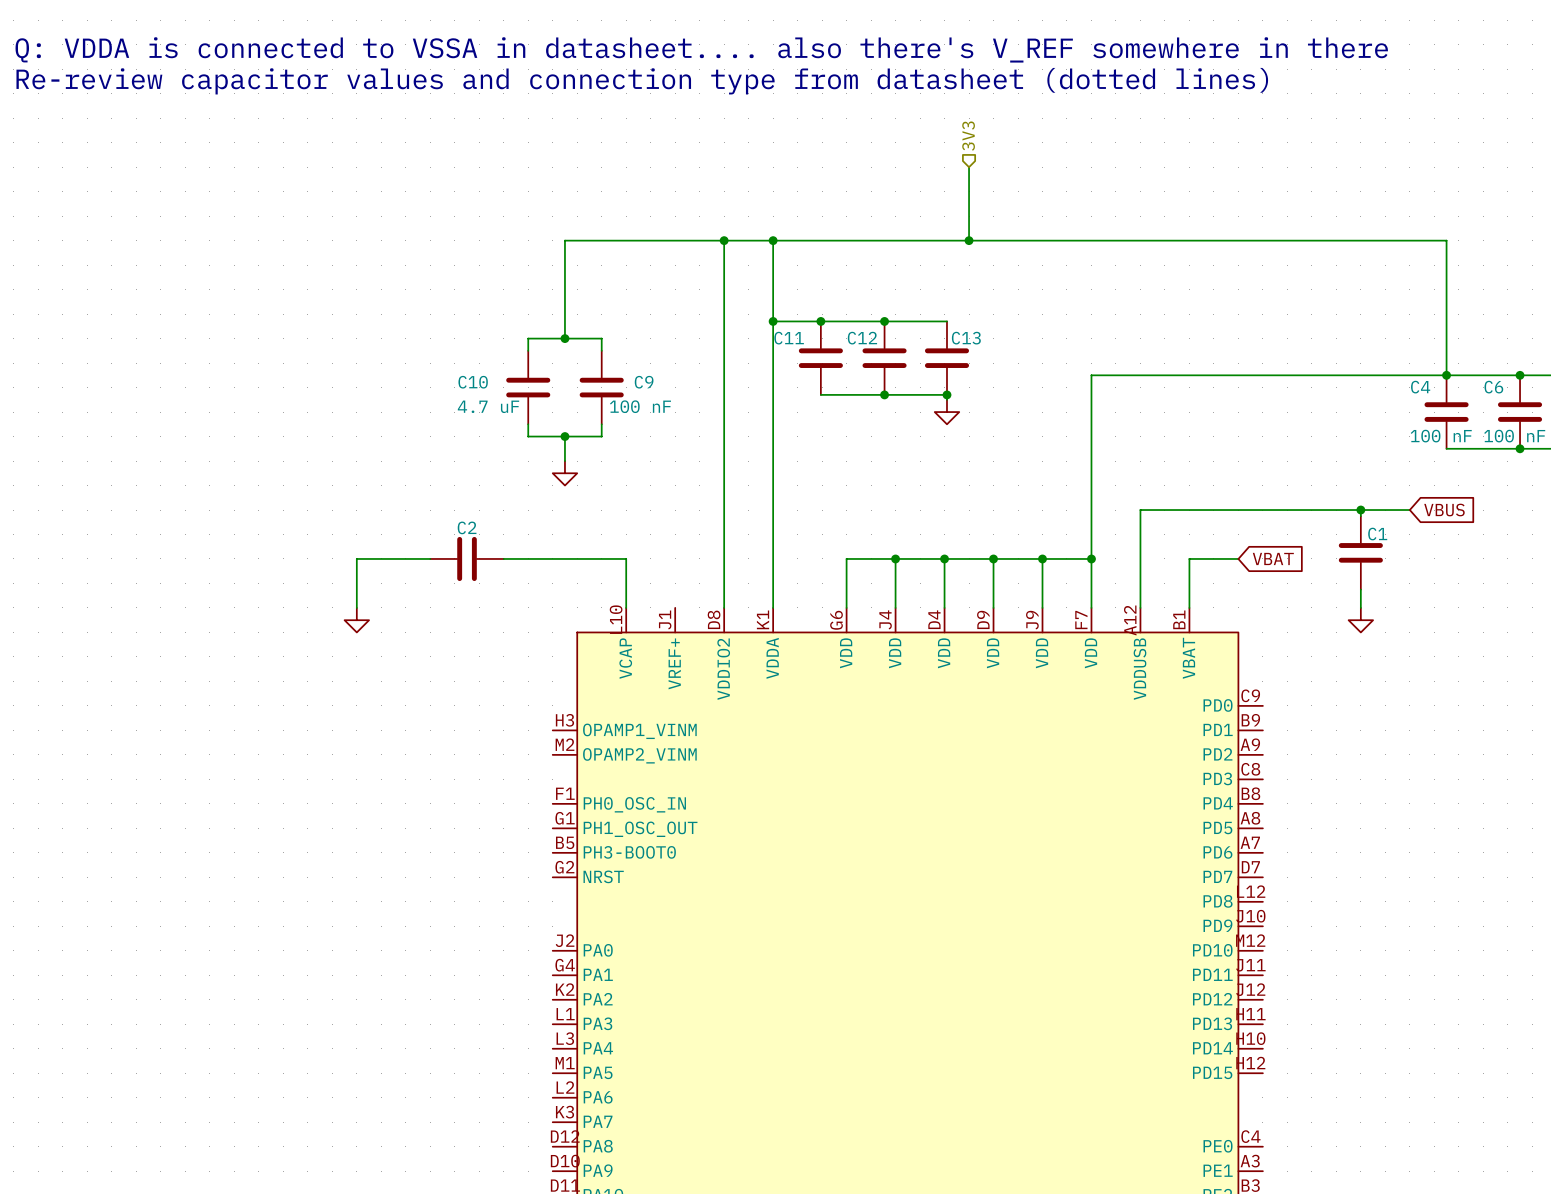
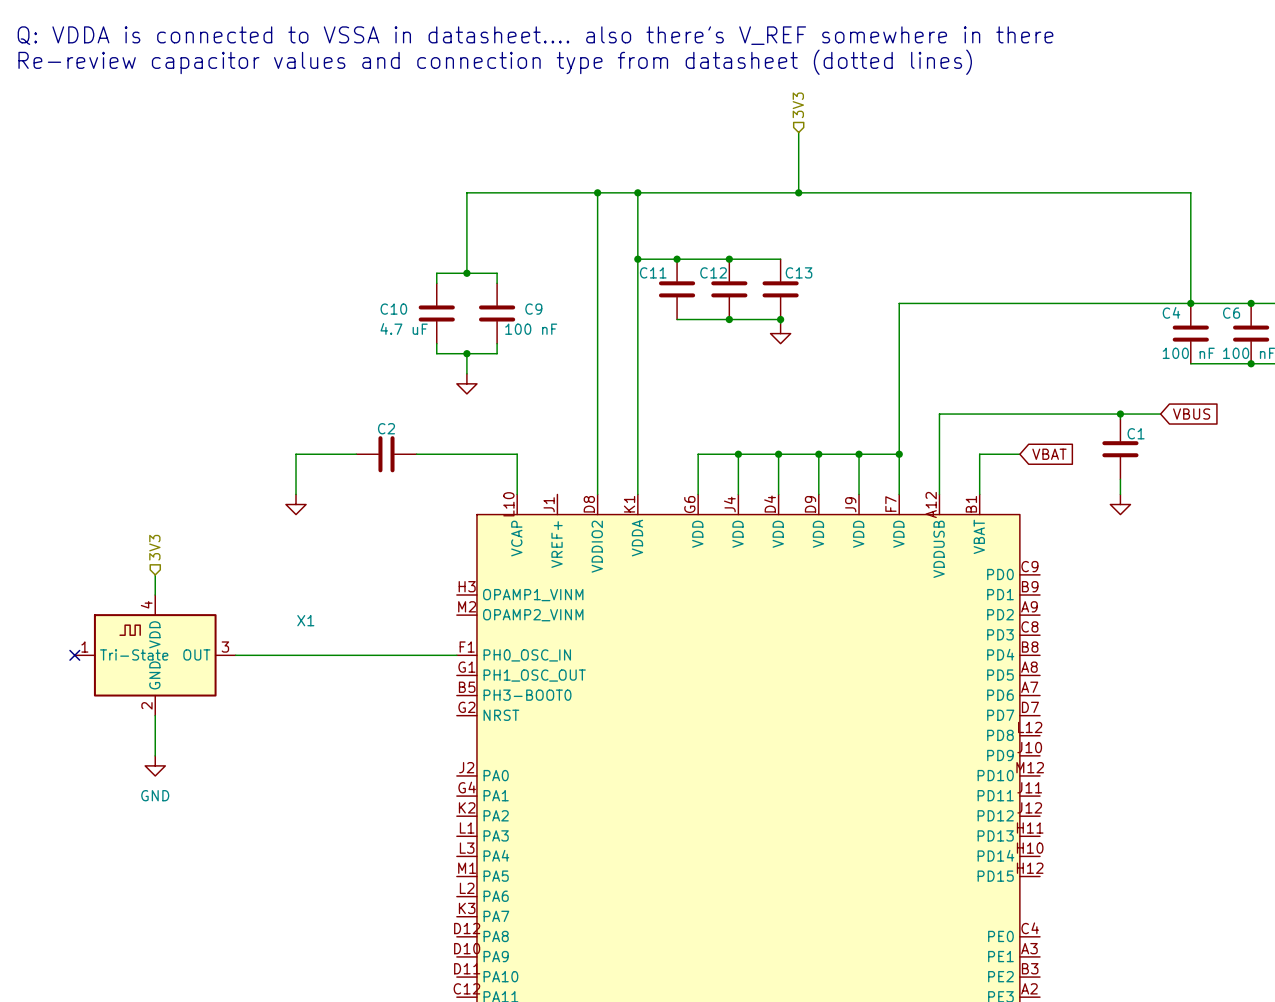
hierarchical label: none -> 3V3 (154, 547)
wire: none -> (155, 574) (155, 595)
no-connect mark: none -> (74, 655)
X1: none -> (155, 655)
wire: none -> (235, 655) (456, 655)
wire: none -> (155, 715) (155, 755)
power symbol: none -> GND (155, 765)

